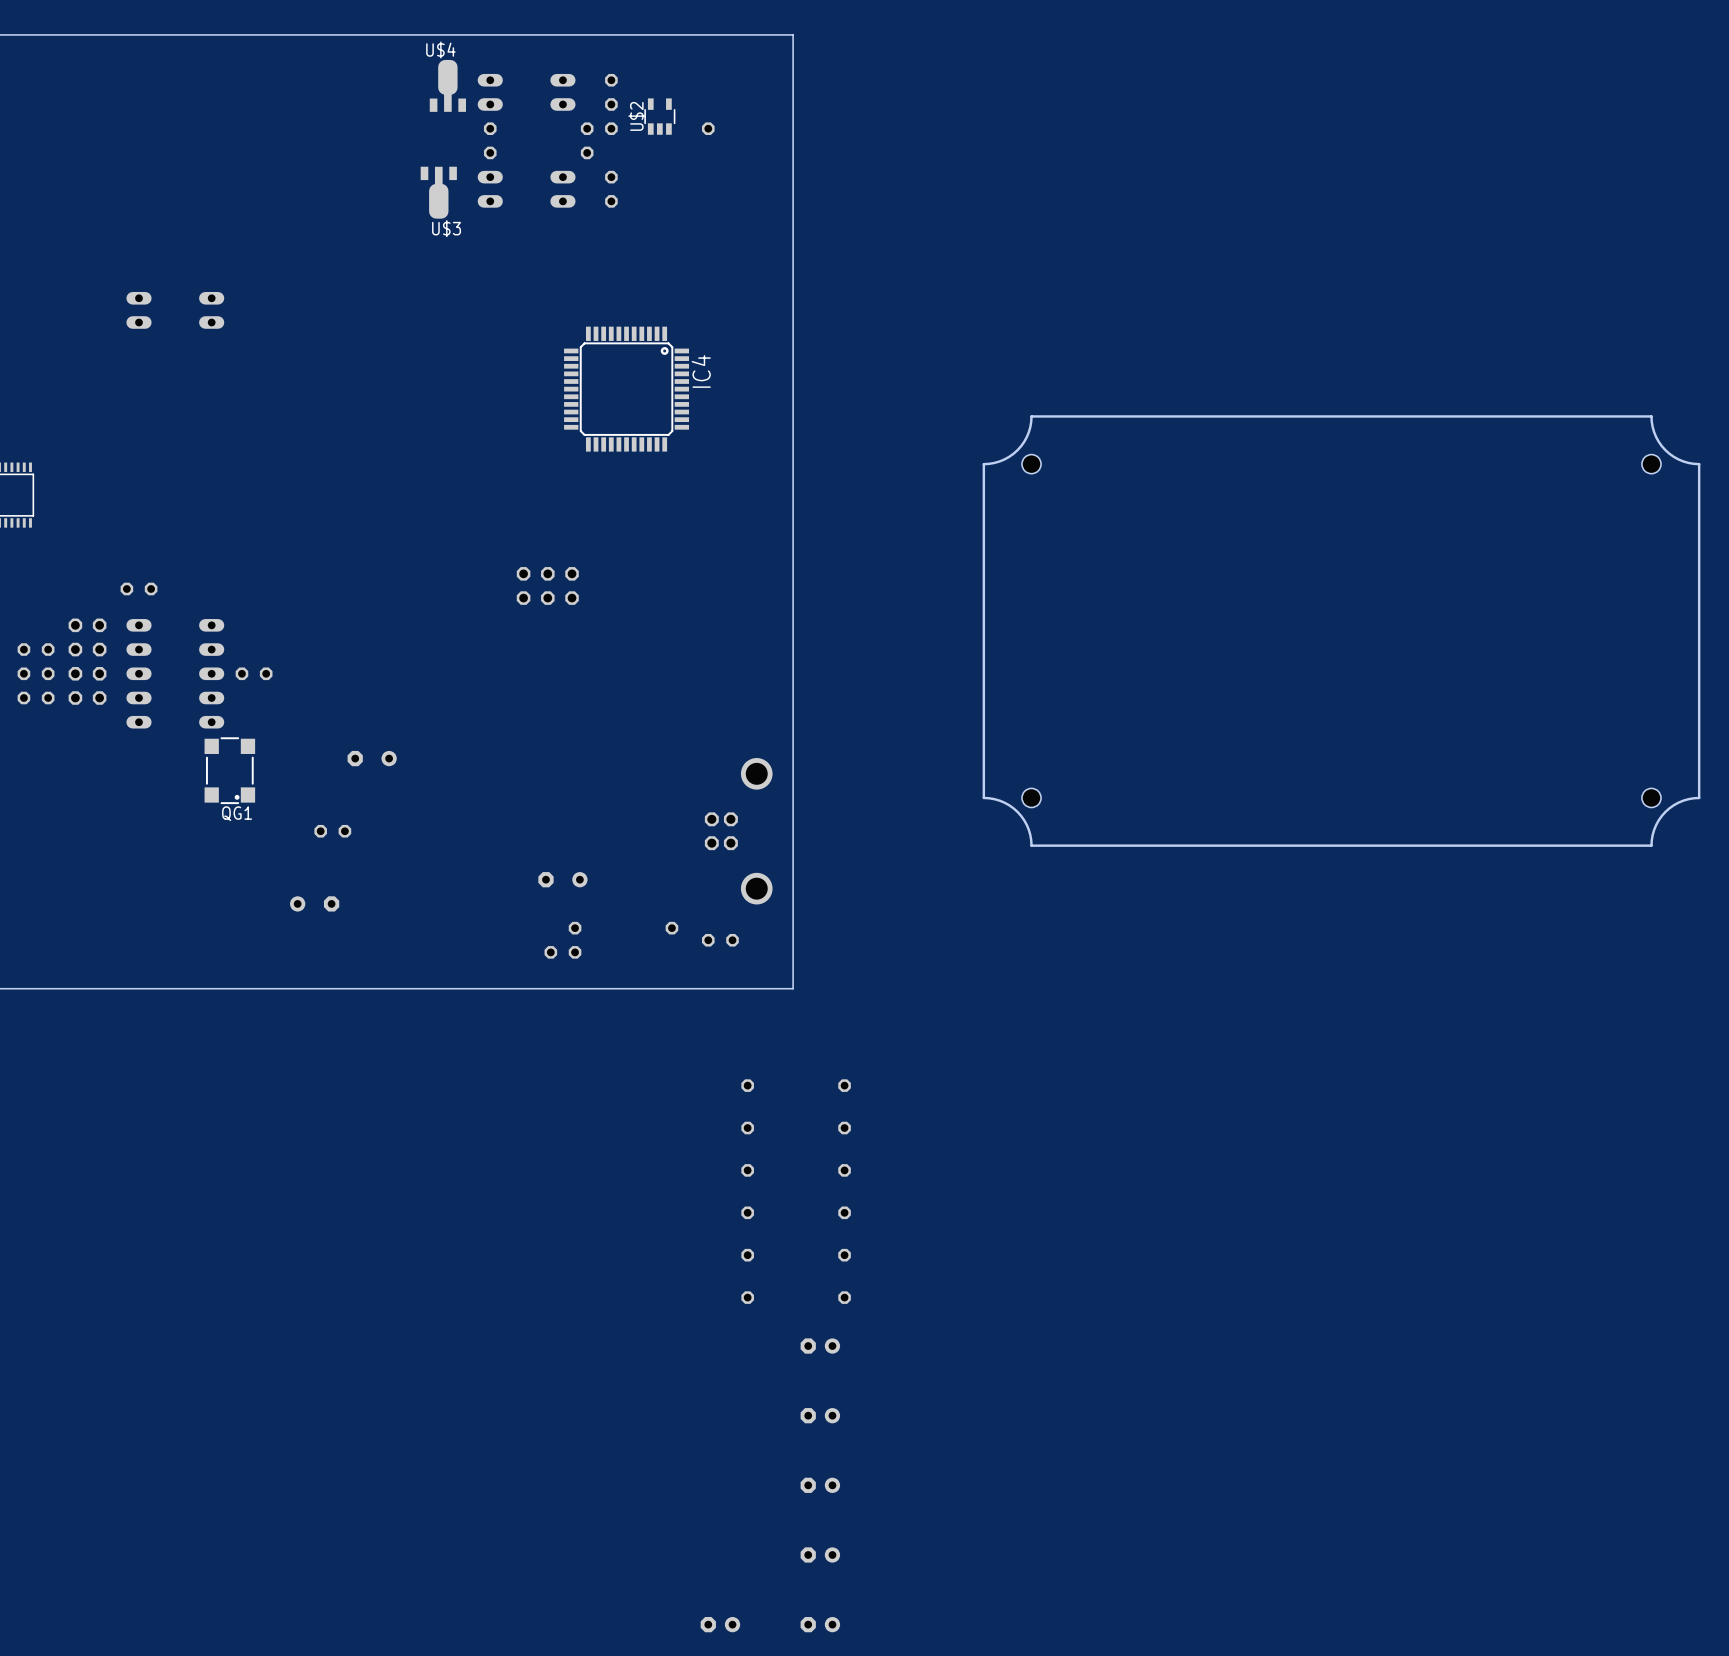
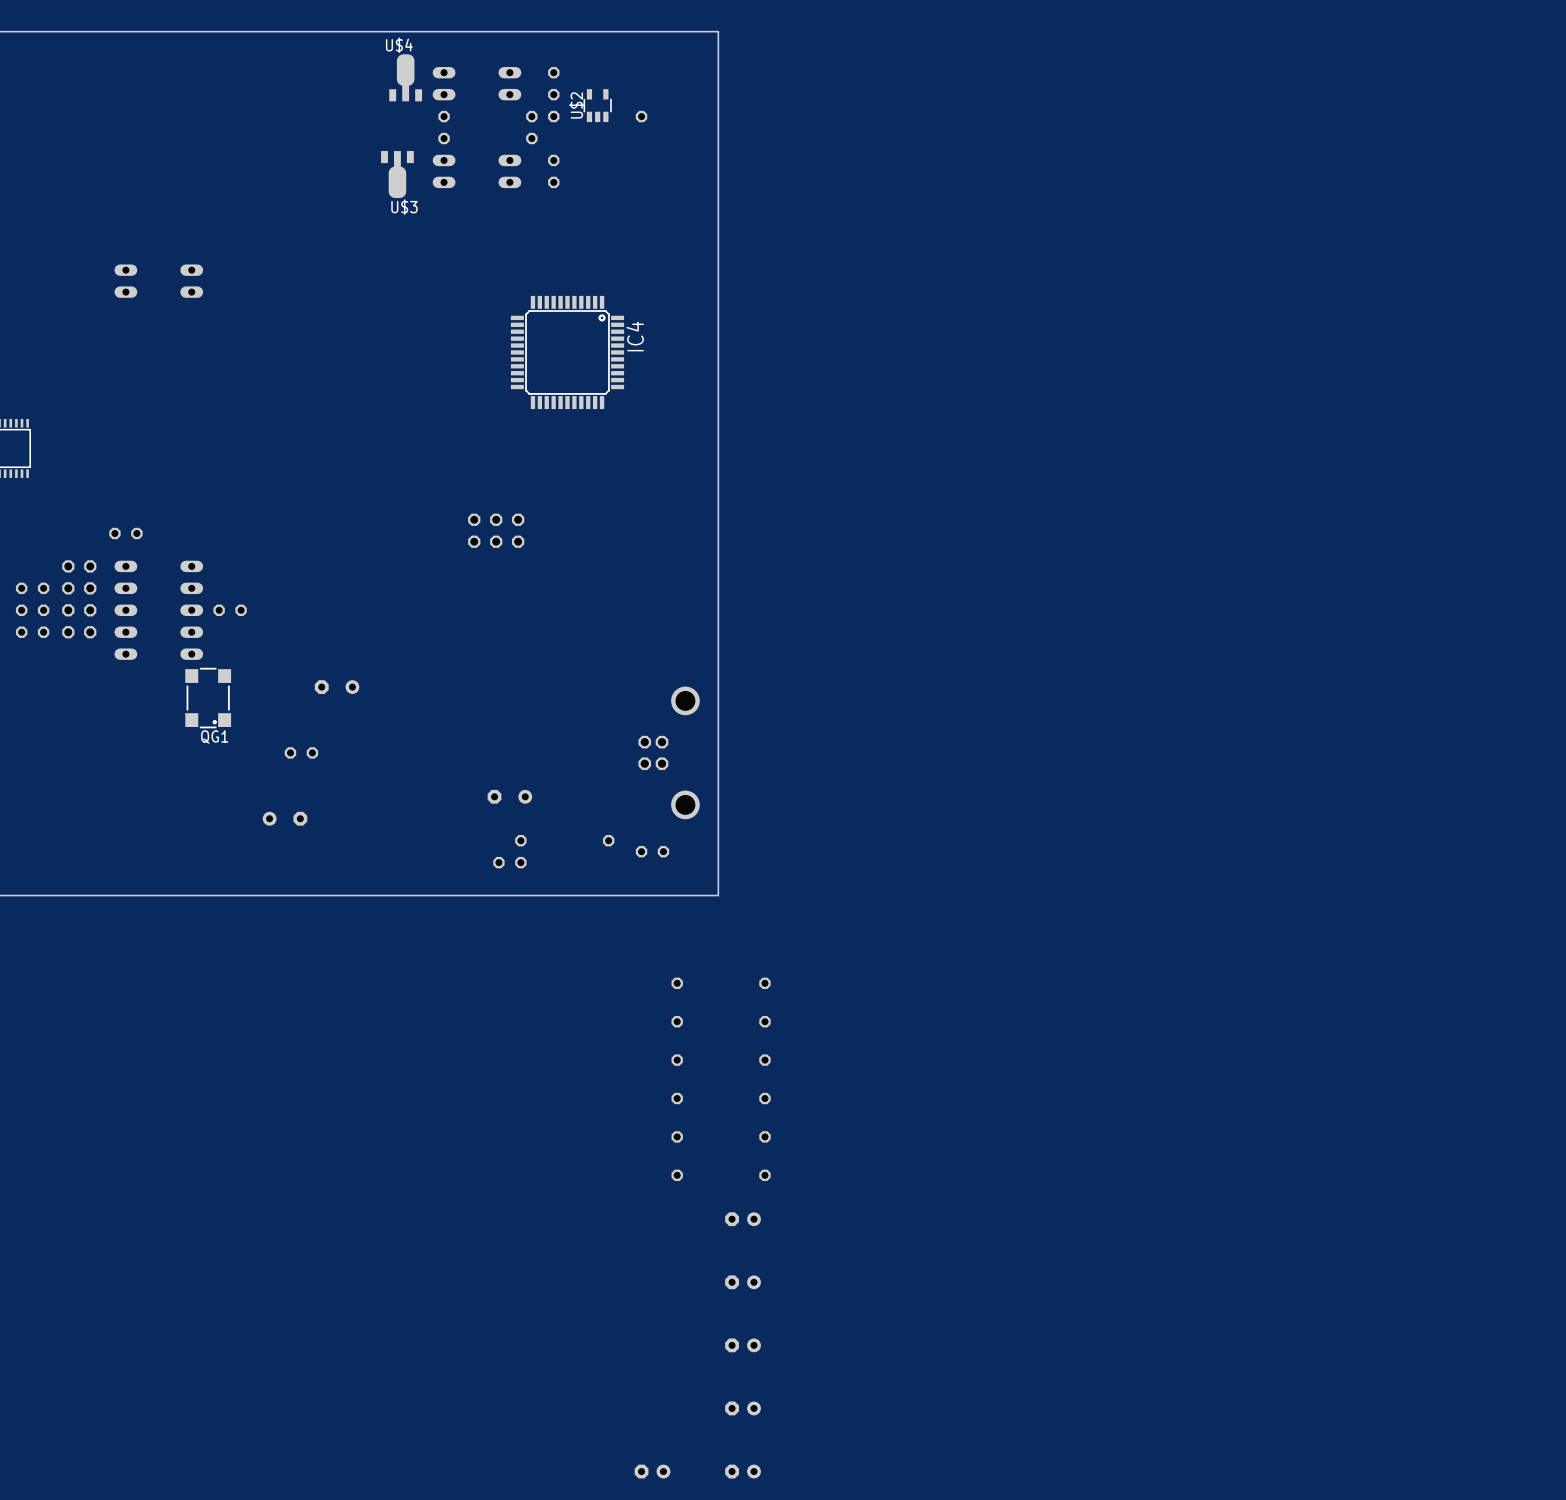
board edge: (1651, 416) (1031, 416) (1028, 432) (1017, 450) (999, 461) (983, 464) (983, 797) (999, 800) (1017, 811) (1028, 829) (1031, 845) (1651, 845) (1654, 829) (1665, 811) (1683, 800) (1699, 797) (1699, 464) (1683, 461) (1665, 450) (1654, 432) (1651, 416) -> none
hole: (1031, 464) -> none
hole: (1651, 464) -> none
hole: (1031, 797) -> none
hole: (1651, 797) -> none

